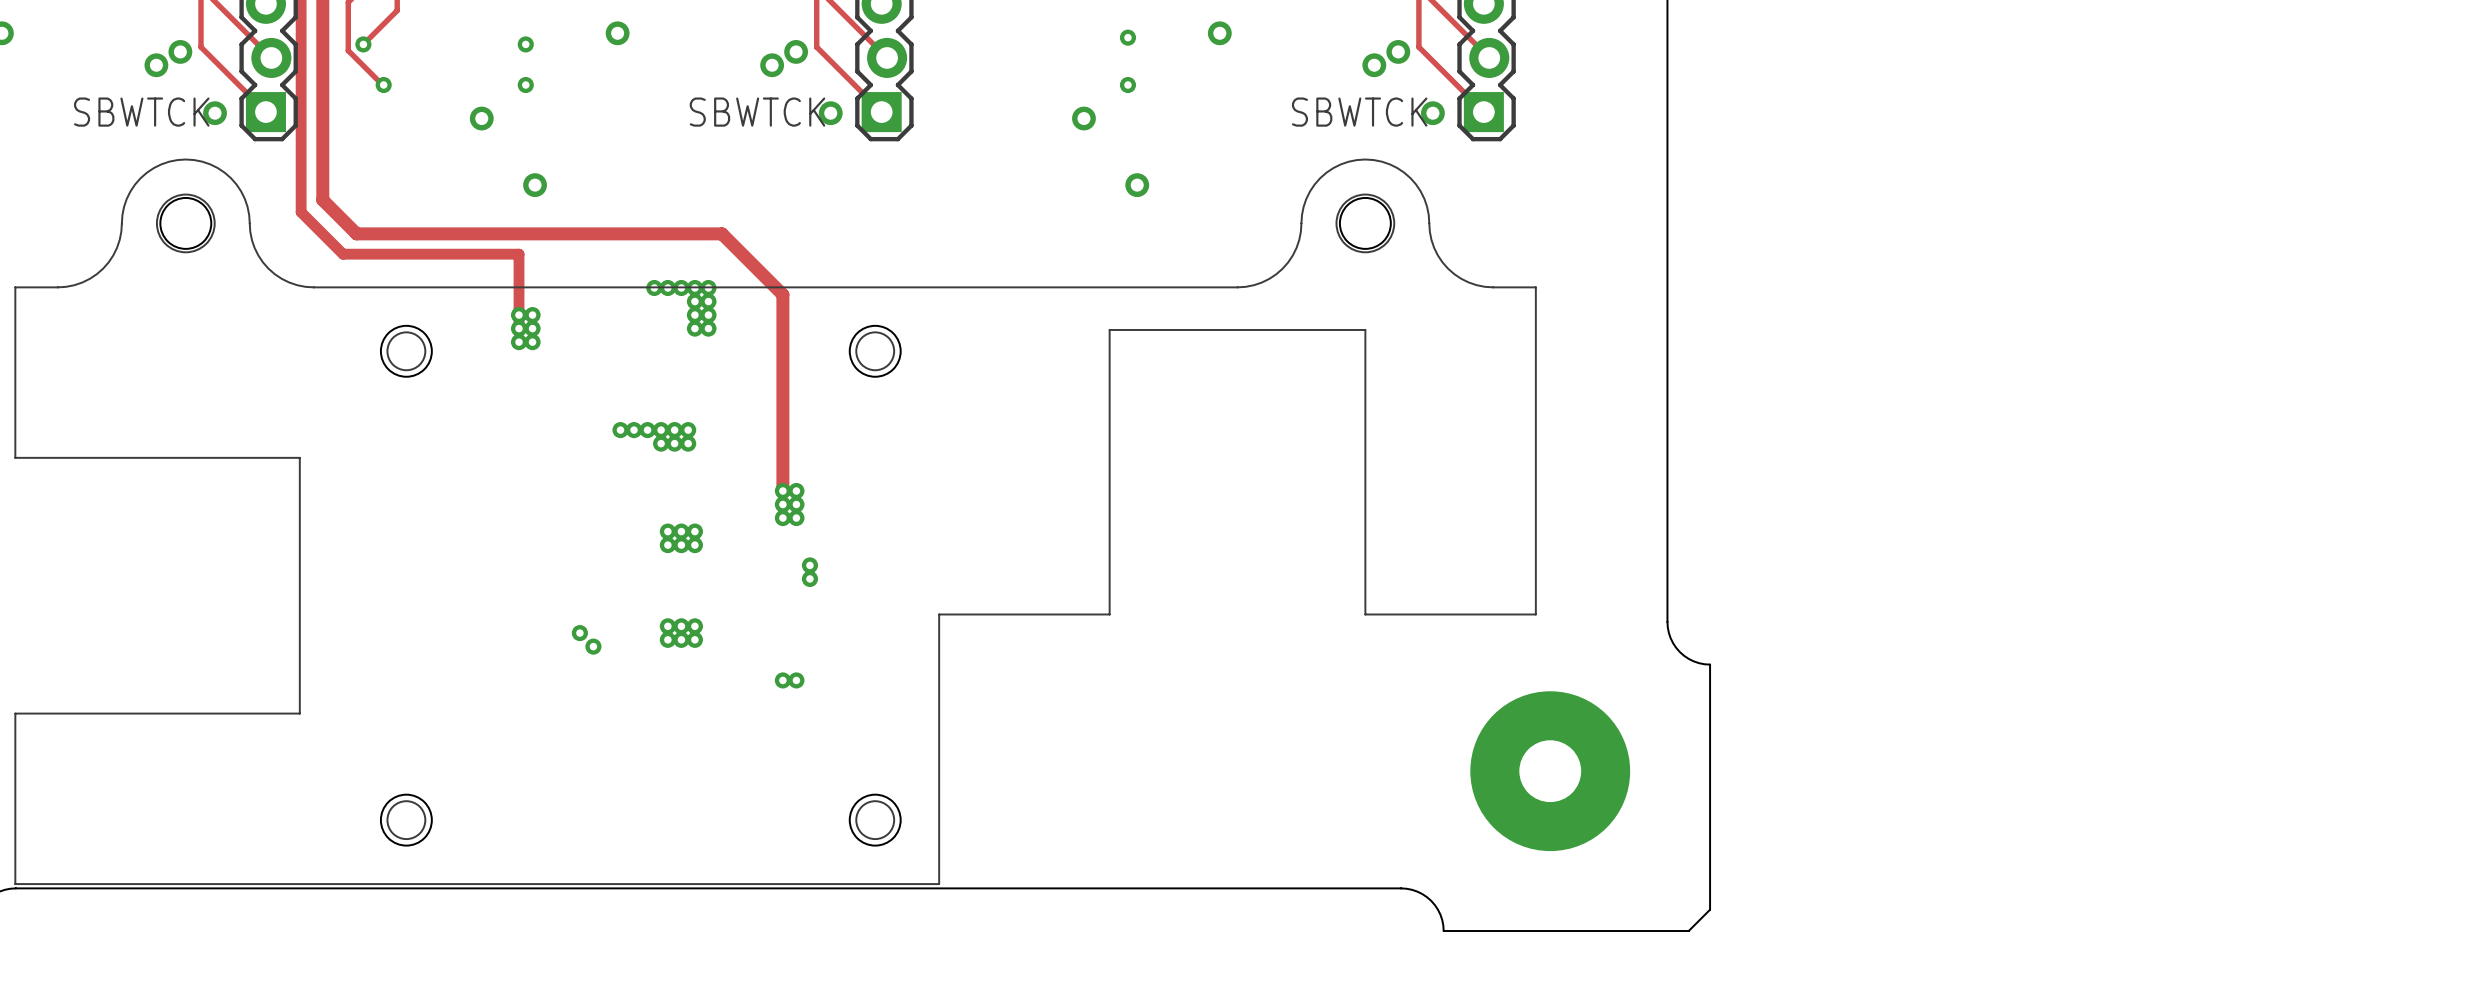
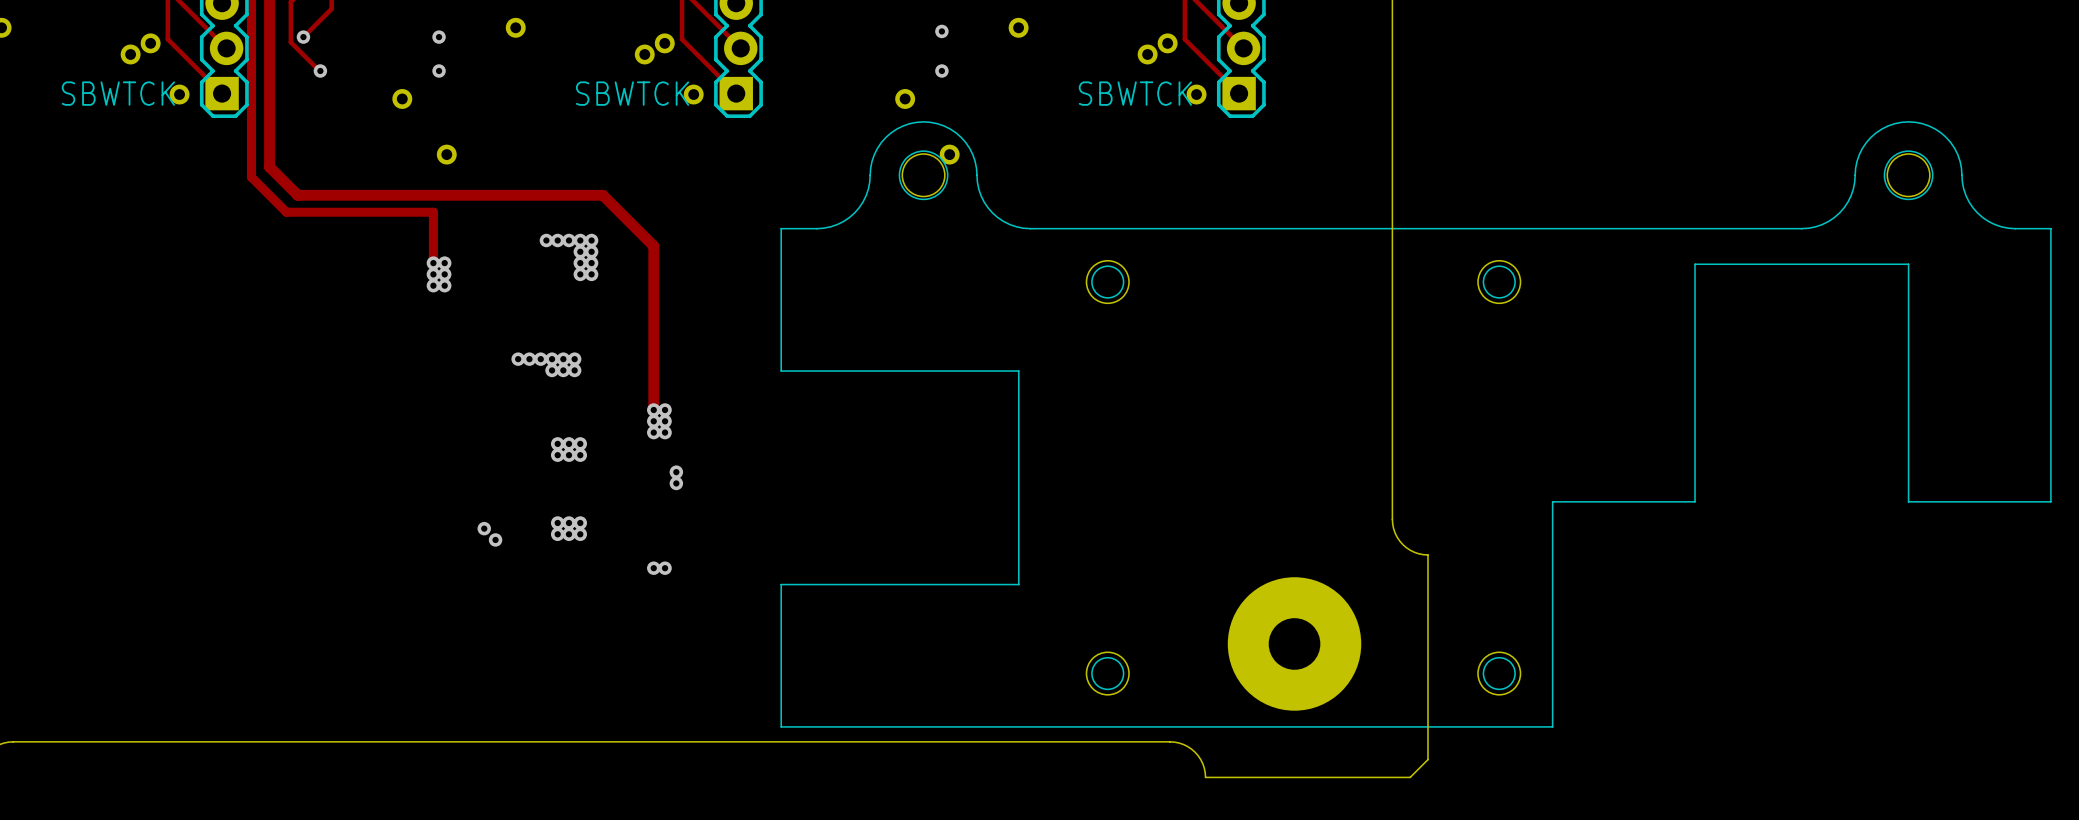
part: none -> (1416, 424)
part: (775, 521) -> none

